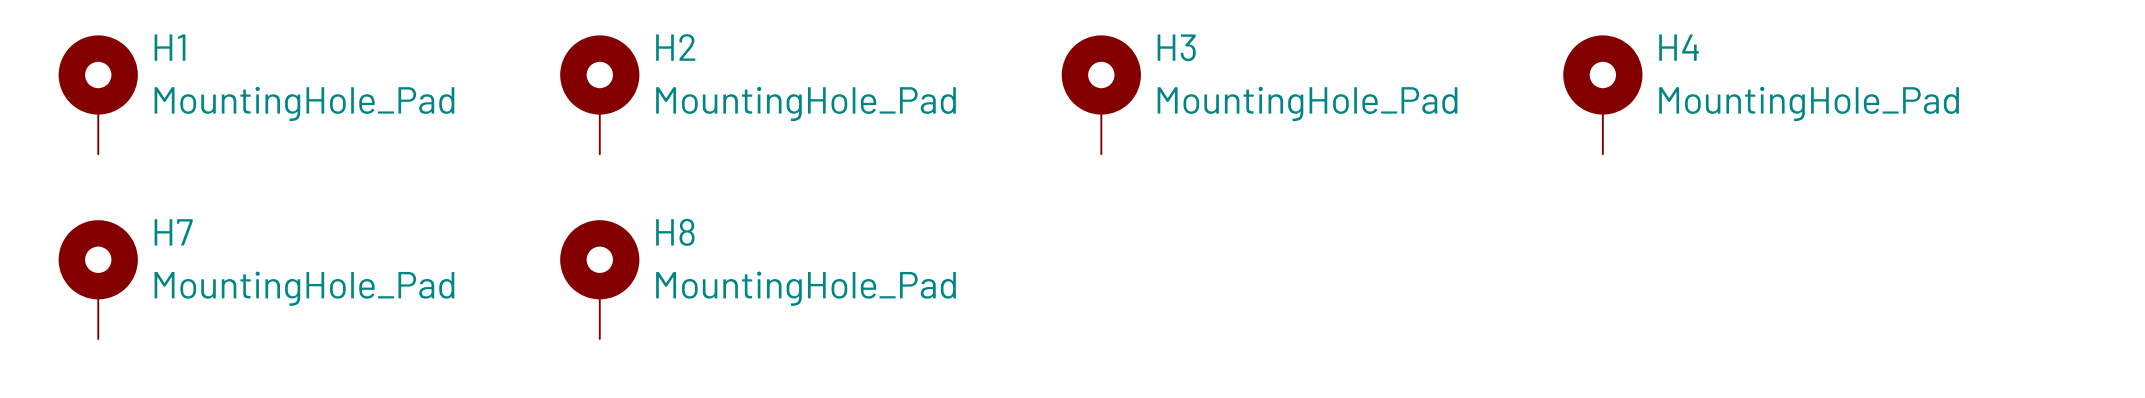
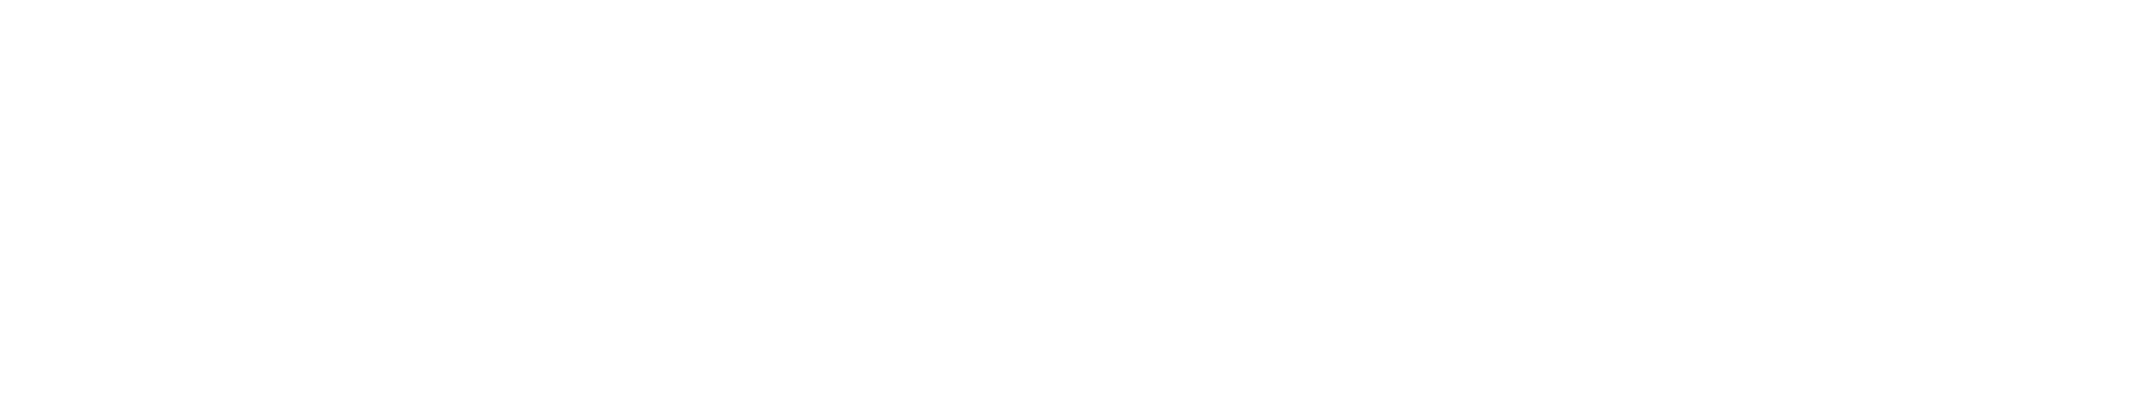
H1: MountingHole_Pad (98, 94) -> none
H2: MountingHole_Pad (599, 94) -> none
H3: MountingHole_Pad (1101, 94) -> none
H4: MountingHole_Pad (1602, 94) -> none
H7: MountingHole_Pad (98, 279) -> none
H8: MountingHole_Pad (599, 279) -> none

